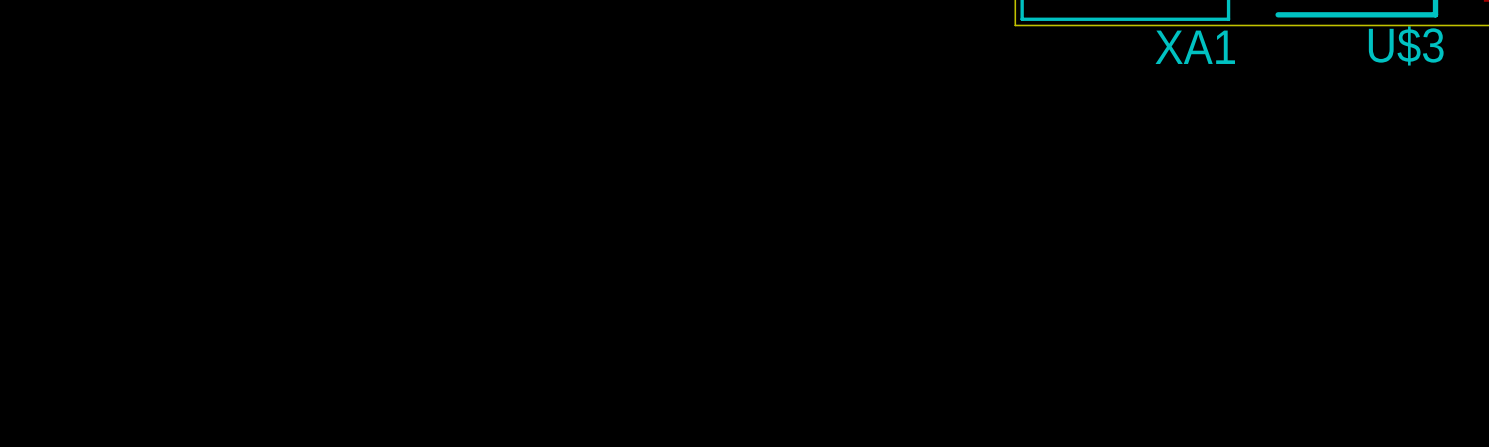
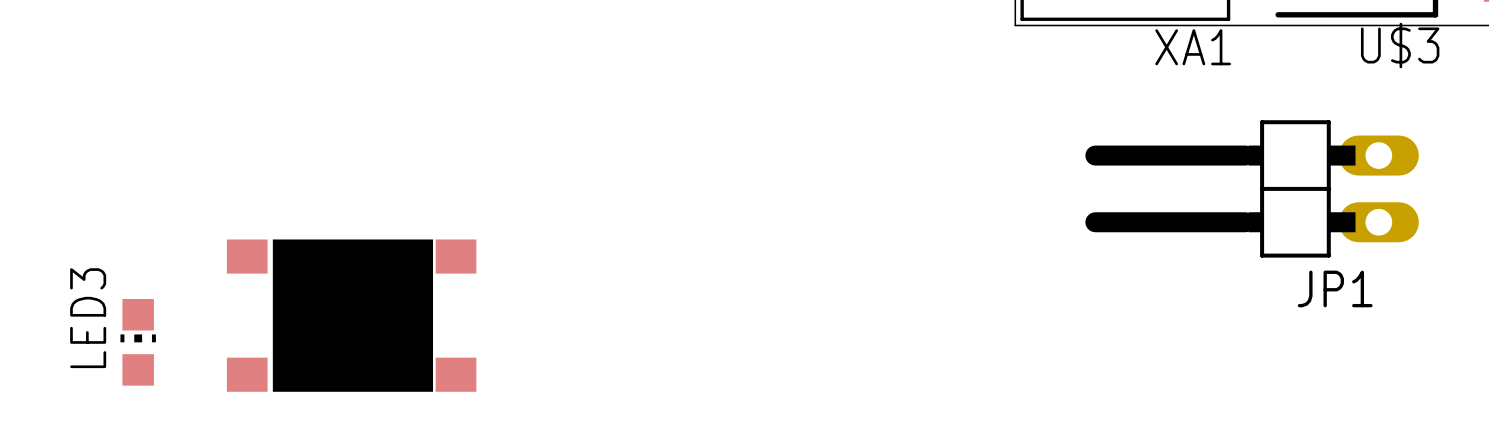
JP1: none -> (1252, 188)
part: none -> (351, 315)
LED3: none -> (138, 342)

